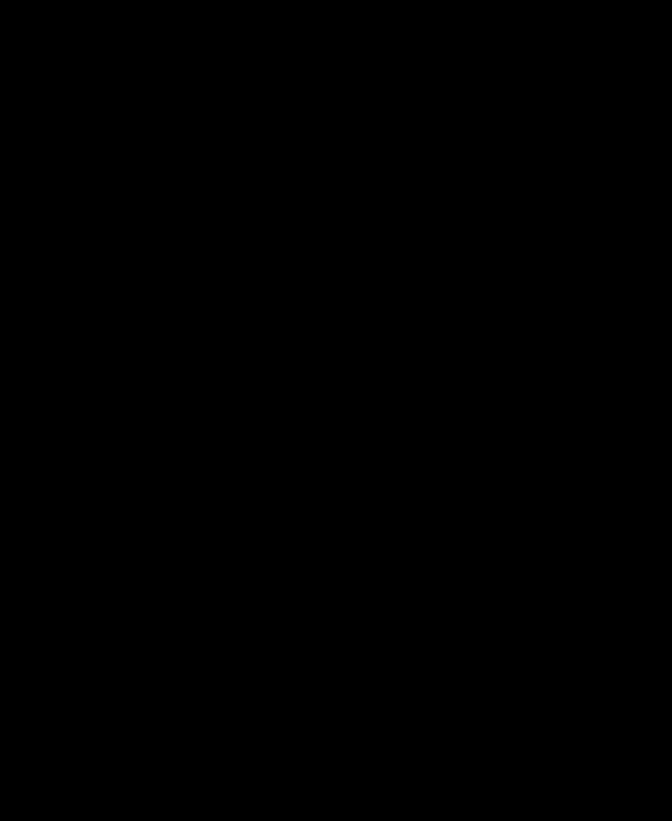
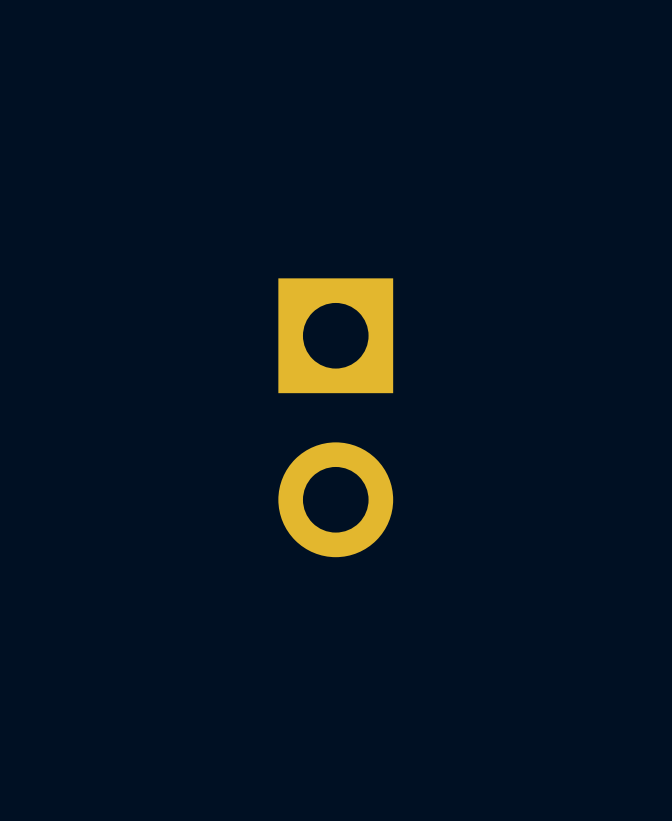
part: none -> (335, 417)

